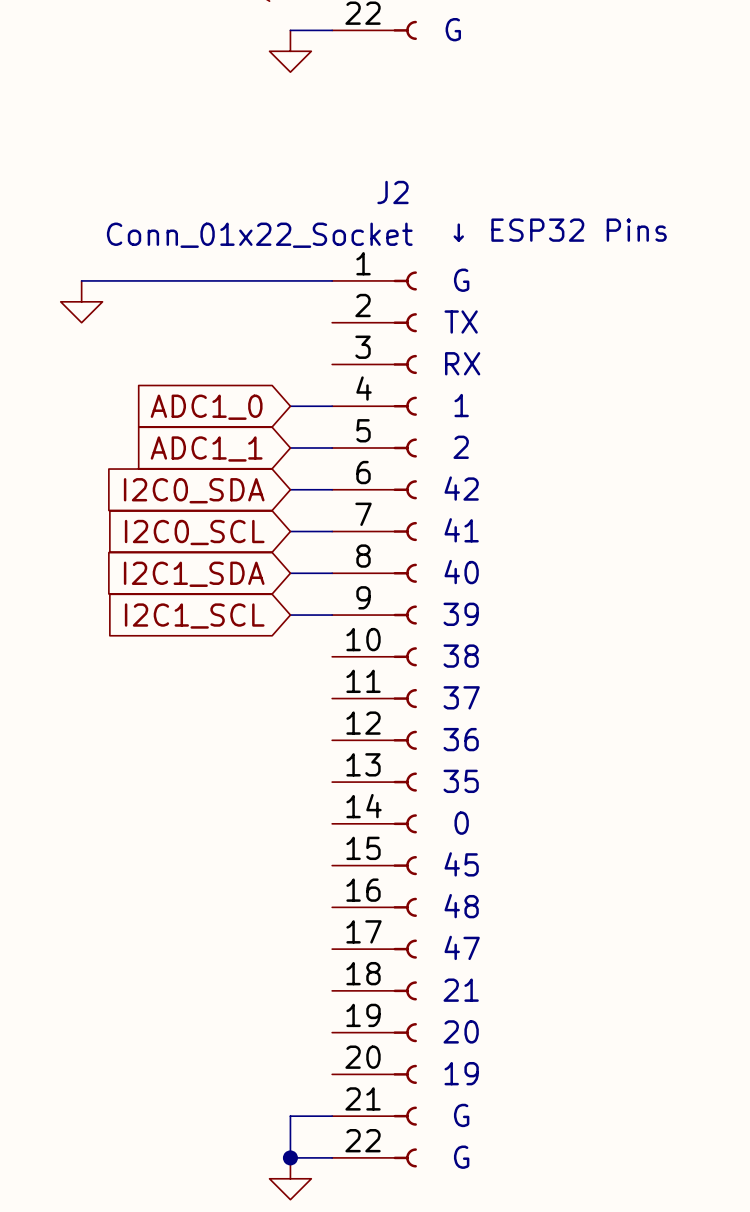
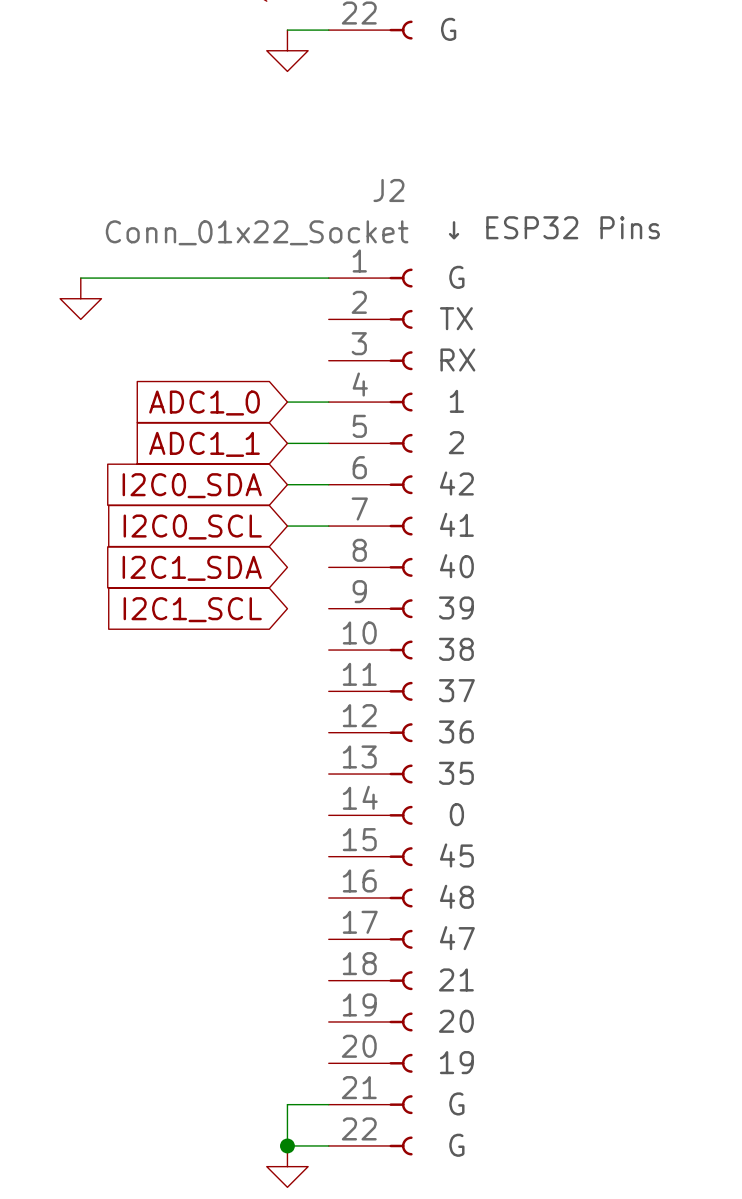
wire: (290, 573) (332, 573) -> none
wire: (290, 615) (332, 615) -> none

